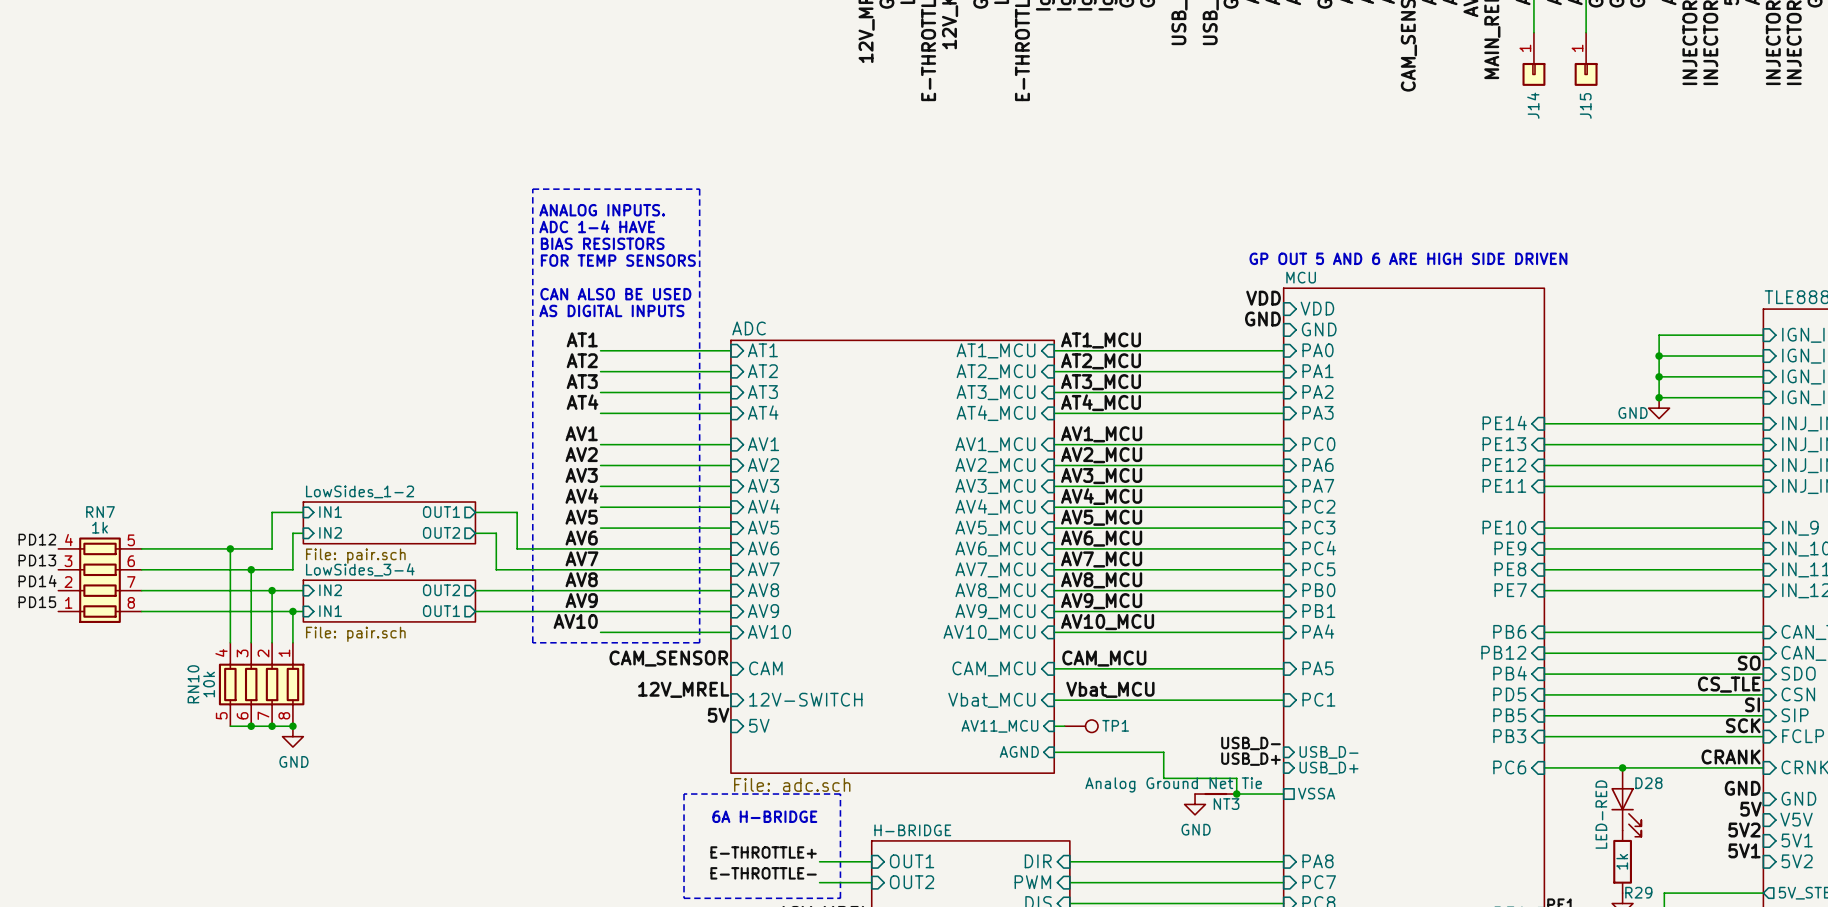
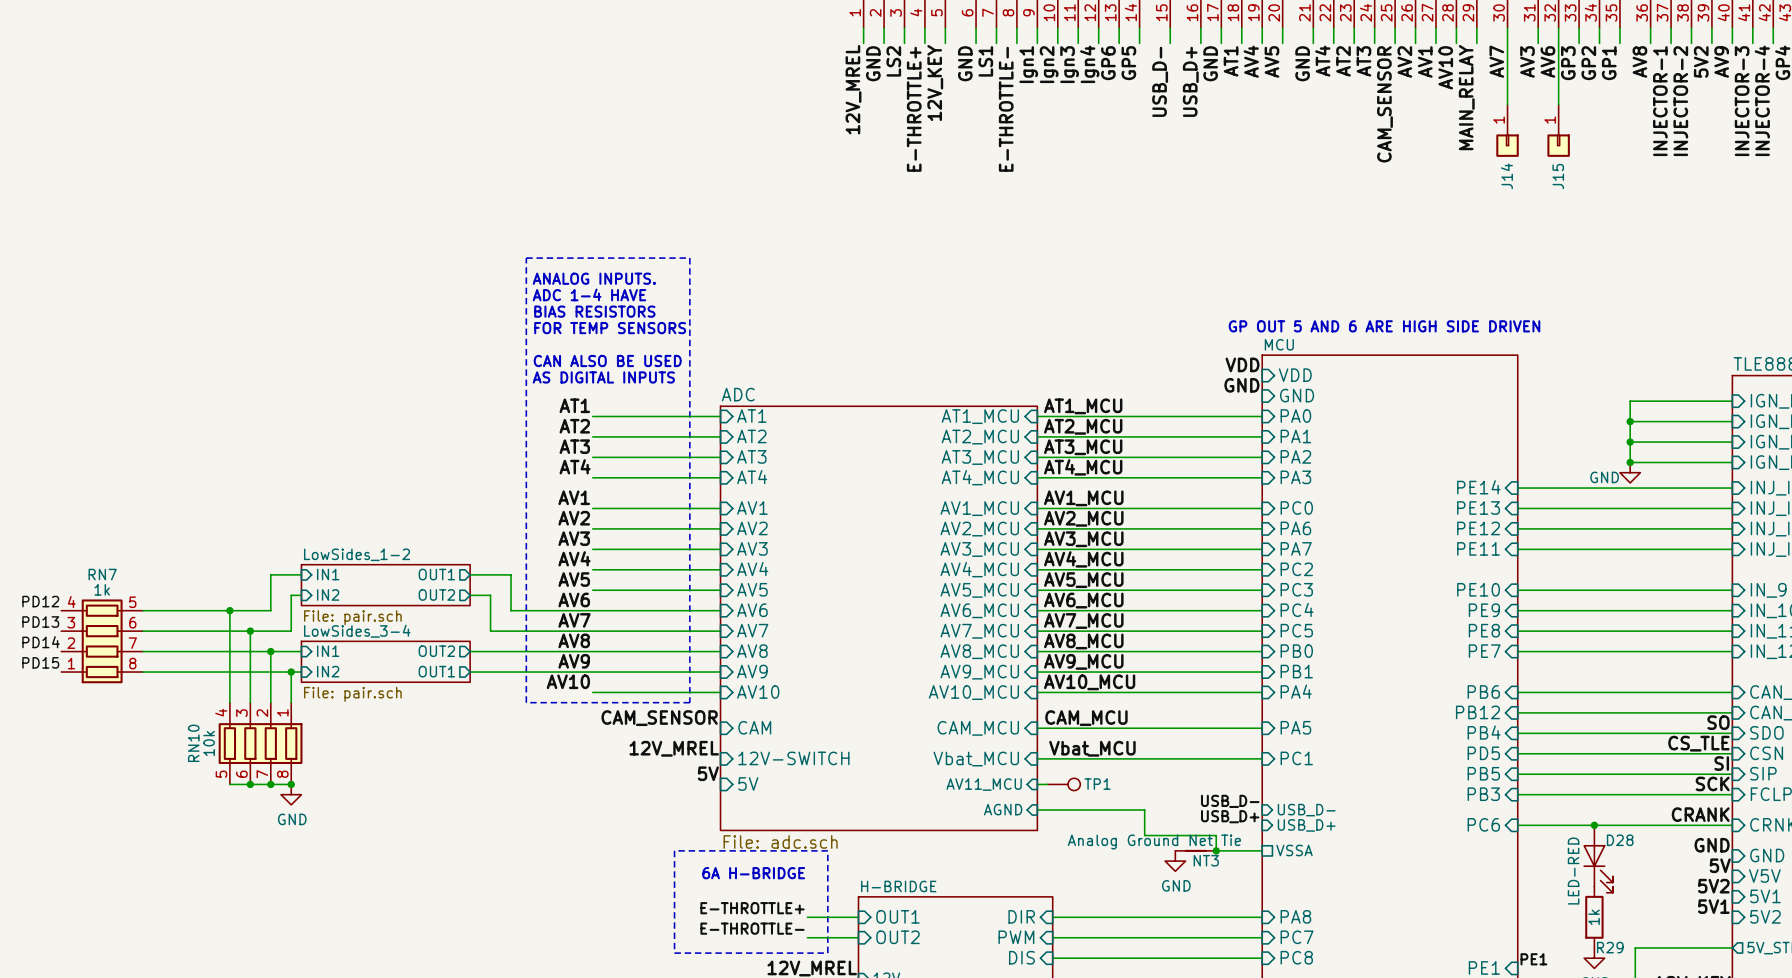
sheet pin: IN2 (330, 590) -> IN1 (328, 651)
sheet pin: IN1 (330, 611) -> IN2 (328, 671)

